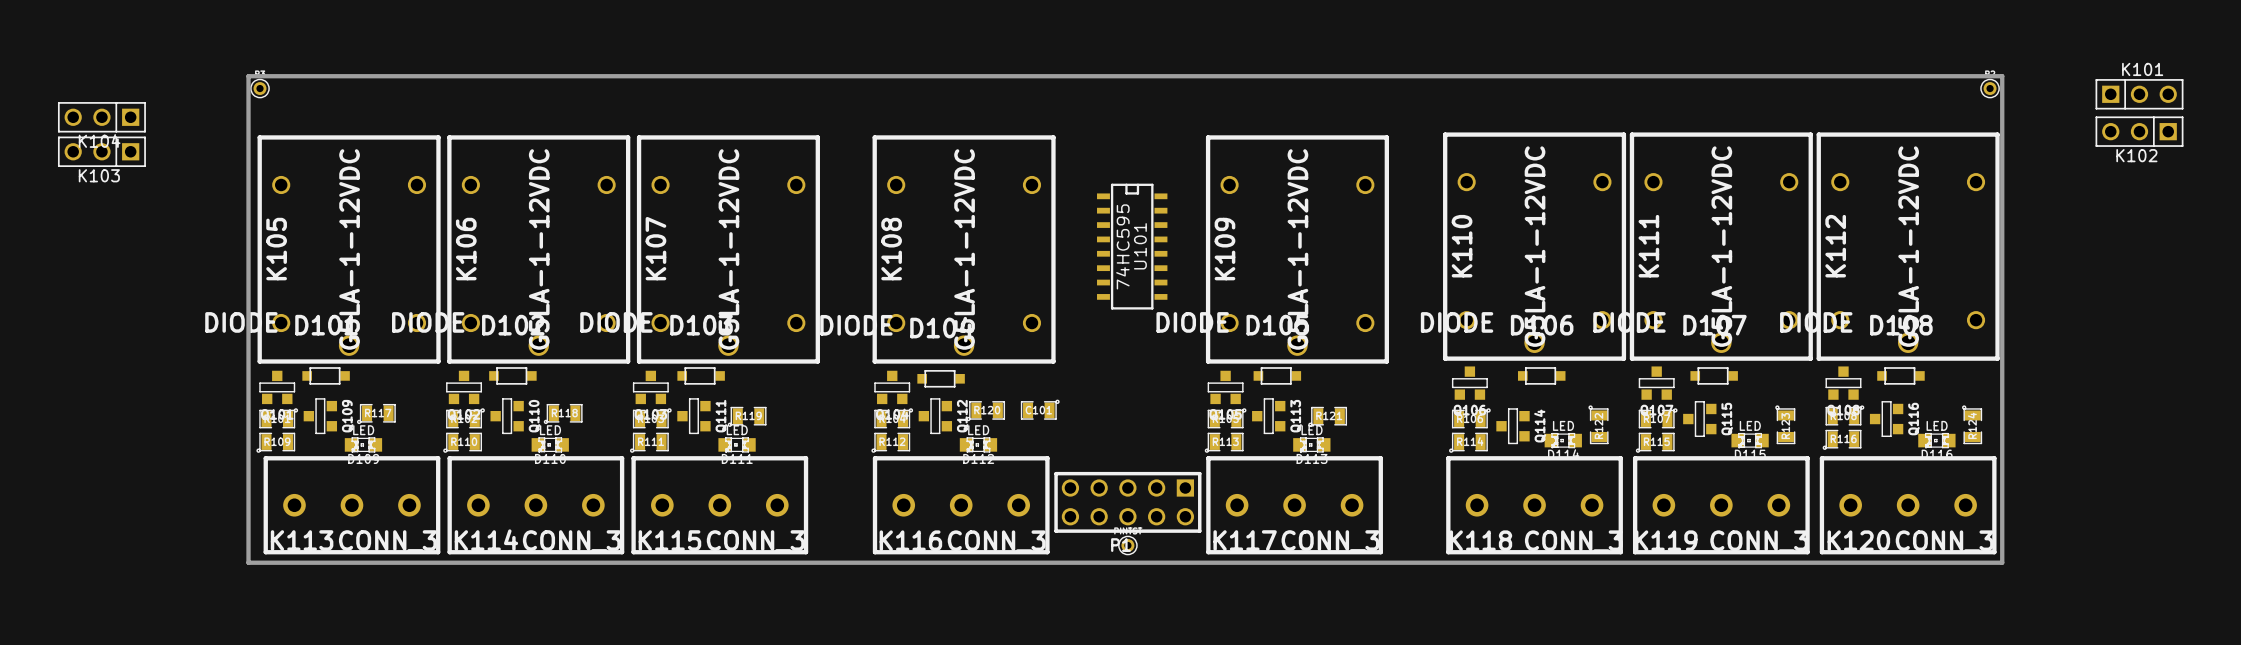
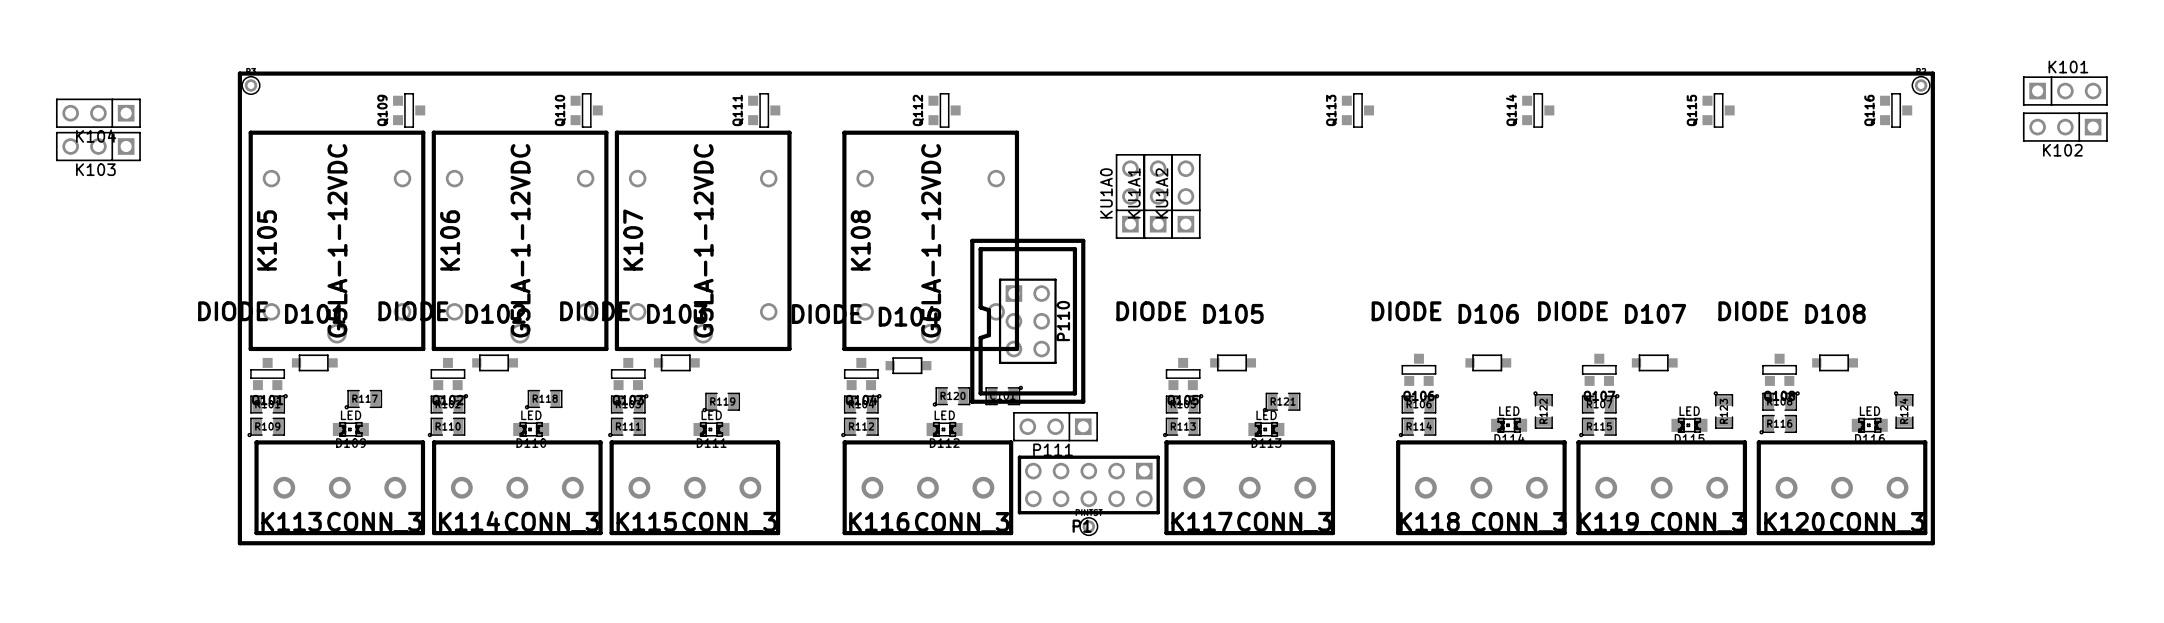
KU1A0: none -> (1130, 196)
KU1A1: none -> (1158, 196)
KU1A2: none -> (1185, 196)
U101: 74HC595 (1132, 246) -> none
K110: G5LA-1-12VDC (1534, 246) -> none
K111: G5LA-1-12VDC (1721, 246) -> none
K112: G5LA-1-12VDC (1908, 246) -> none
K109: G5LA-1-12VDC (1297, 249) -> none
P110: none -> (1027, 321)
Q109 rotation: 0° (320, 416) -> 180° (409, 110)
Q109 position: (320, 416) -> (409, 110)
Q110 rotation: 0° (507, 416) -> 180° (586, 110)
Q110 position: (507, 416) -> (586, 110)
Q111 rotation: 0° (693, 416) -> 180° (764, 110)
Q111 position: (693, 416) -> (764, 110)
Q112 rotation: 0° (935, 416) -> 180° (944, 110)
Q112 position: (935, 416) -> (944, 110)
Q113 rotation: 0° (1268, 416) -> 180° (1357, 110)
Q113 position: (1268, 416) -> (1357, 110)
Q115 rotation: 0° (1699, 419) -> 180° (1718, 110)
Q115 position: (1699, 419) -> (1718, 110)
Q116 rotation: 0° (1886, 419) -> 180° (1896, 110)
Q116 position: (1886, 419) -> (1896, 110)
Q114 rotation: 0° (1513, 426) -> 180° (1538, 110)
Q114 position: (1513, 426) -> (1538, 110)
P111: none -> (1055, 426)

